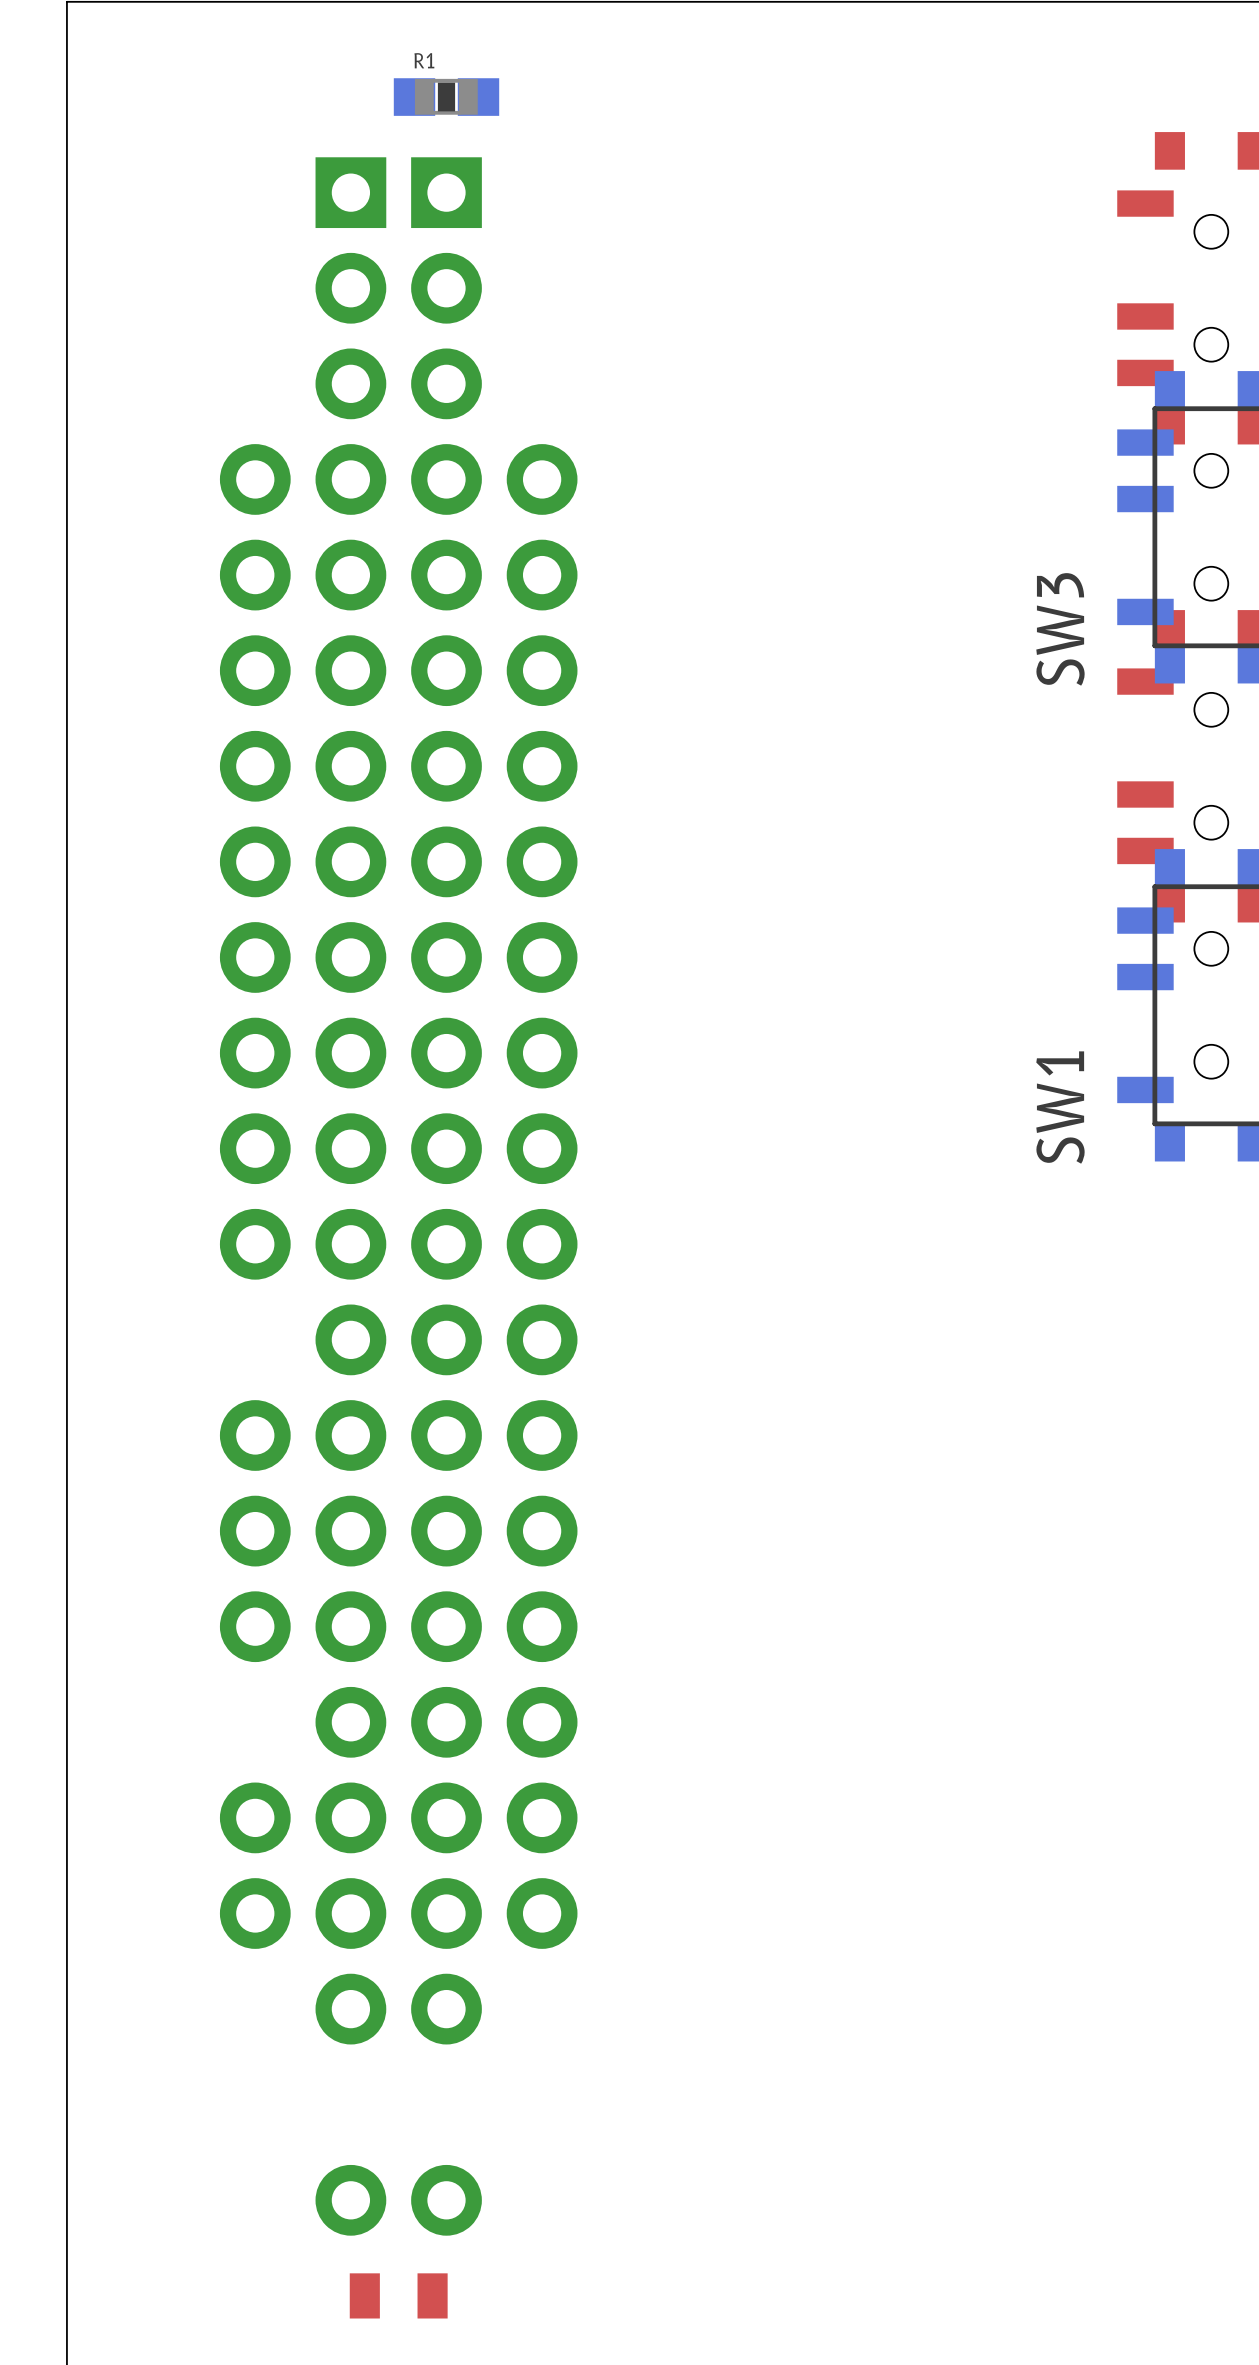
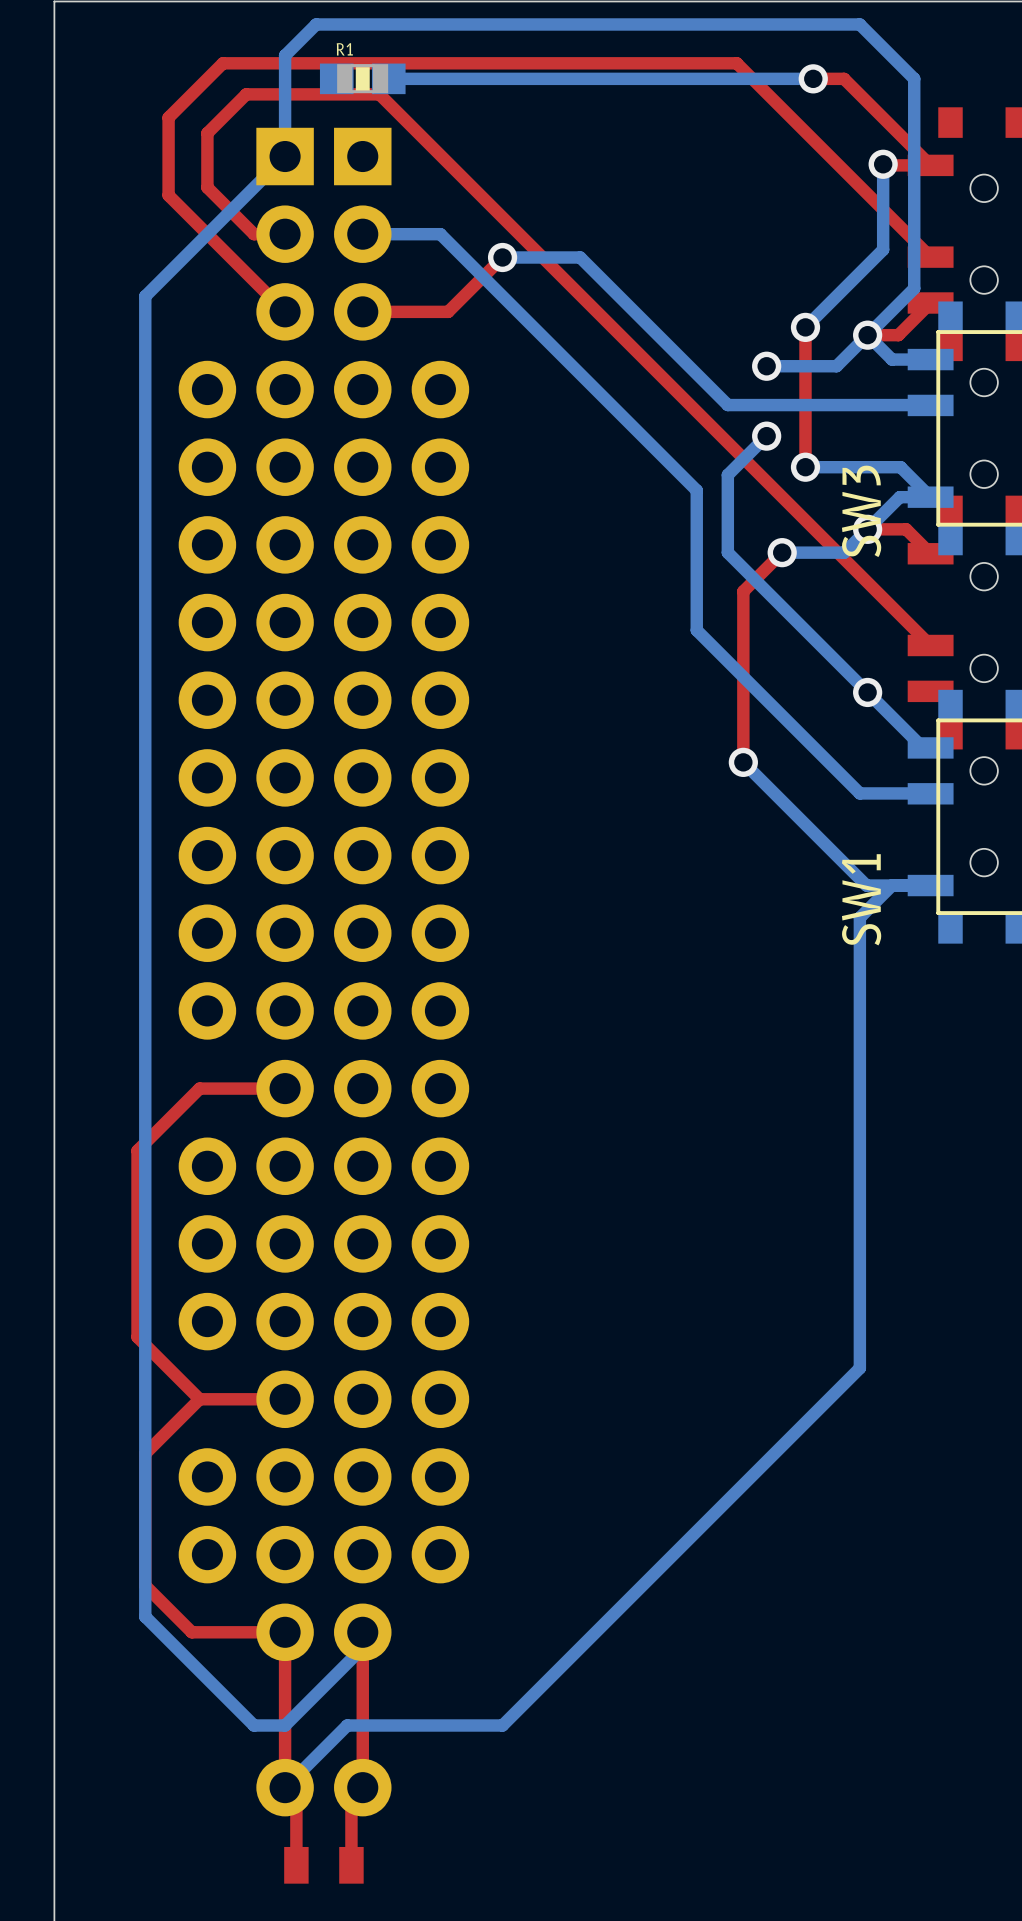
top track: none -> (813, 78) (844, 78) (930, 165) (883, 164)
bottom track: none -> (813, 78) (388, 78)
via: none -> (813, 78)
bottom track: none -> (883, 164) (883, 249) (805, 327)
via: none -> (883, 164)
top track: none -> (285, 234) (254, 234) (207, 187) (207, 133) (246, 94) (379, 94) (930, 645)
bottom track: none -> (362, 234) (440, 234) (696, 490) (696, 630) (859, 793) (930, 793)
top track: none -> (502, 257) (448, 311) (362, 311)
bottom track: none -> (502, 257) (580, 257) (727, 405) (930, 405)
via: none -> (502, 257)
top track: none -> (930, 257) (736, 63) (222, 63) (168, 117) (168, 195) (285, 311)
top track: none -> (930, 302) (898, 335) (867, 335)
top track: none -> (805, 327) (805, 467)
via: none -> (805, 327)
bottom track: none -> (867, 335) (892, 359) (930, 359)
via: none -> (867, 335)
bottom track: none -> (766, 366) (836, 366) (914, 288) (914, 78) (859, 24) (316, 24) (285, 55) (285, 156) (145, 296) (145, 1616) (254, 1725) (285, 1725) (362, 1647) (362, 1632)
via: none -> (766, 366)
bottom track: none -> (766, 436) (727, 474) (727, 552) (923, 747) (930, 747)
via: none -> (766, 436)
bottom track: none -> (805, 467) (900, 467) (930, 497) (899, 497) (844, 552) (782, 552)
via: none -> (805, 467)
top track: none -> (867, 529) (906, 529) (930, 553)
via: none -> (867, 529)
top track: none -> (782, 552) (743, 591) (743, 762)
via: none -> (782, 552)
via: none -> (867, 692)
bottom track: none -> (743, 762) (866, 885) (930, 885)
via: none -> (743, 762)
bottom track: none -> (892, 885) (859, 917) (859, 1368) (502, 1725) (347, 1725) (285, 1787)
top track: none -> (285, 1088) (199, 1088) (137, 1150) (137, 1337) (199, 1399)
top track: none -> (199, 1399) (145, 1453) (145, 1585) (191, 1632) (285, 1632) (285, 1787) (296, 1798) (296, 1865)
top track: none -> (285, 1399) (199, 1399)
top track: none -> (362, 1632) (362, 1787) (351, 1798) (351, 1865)

